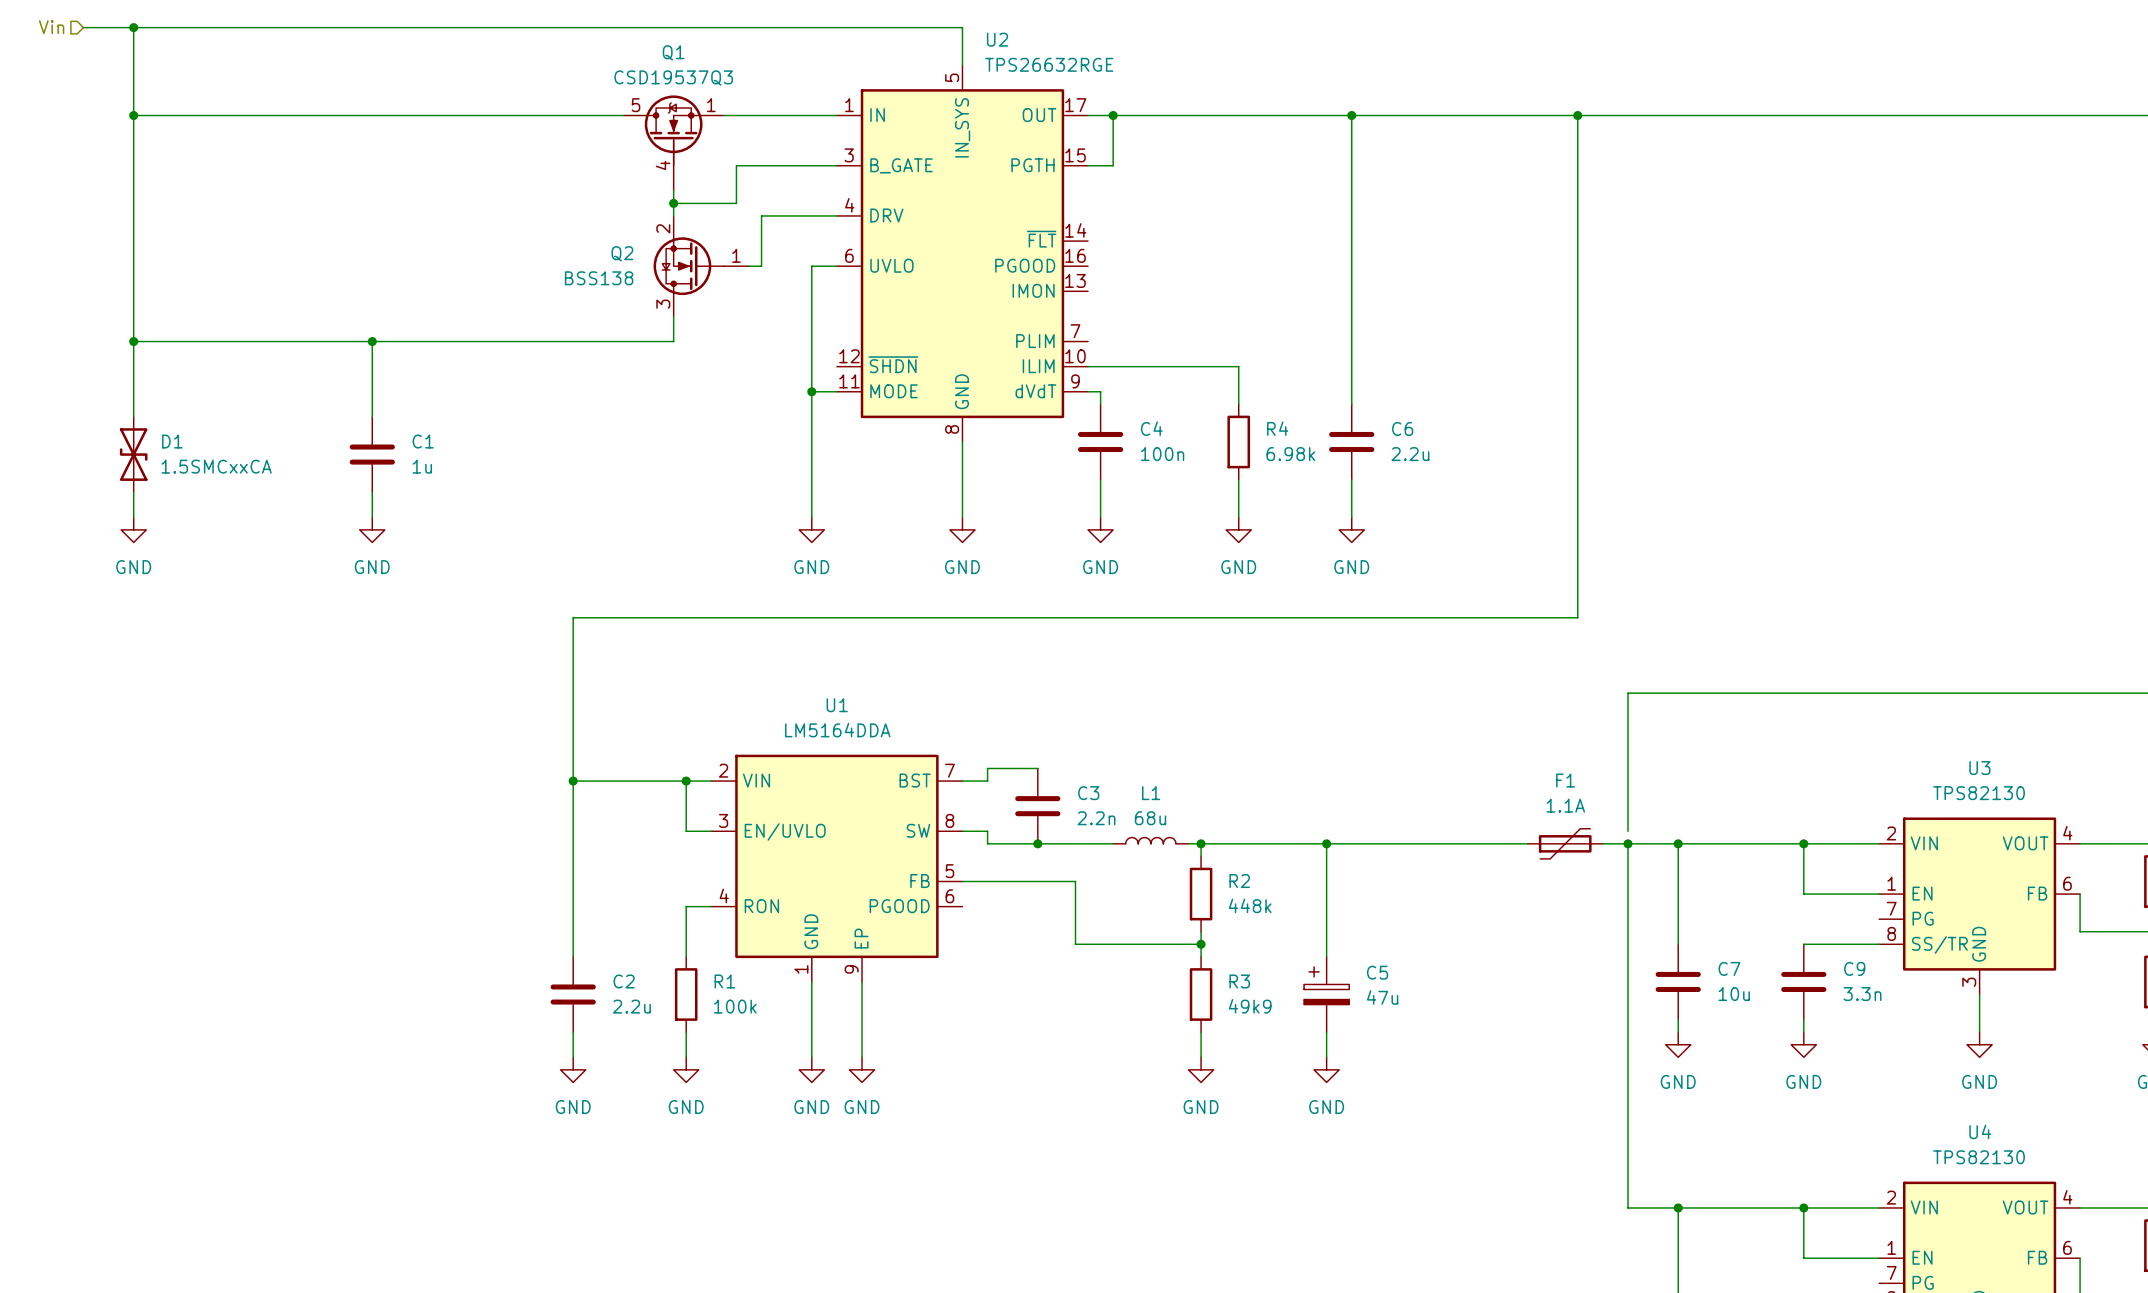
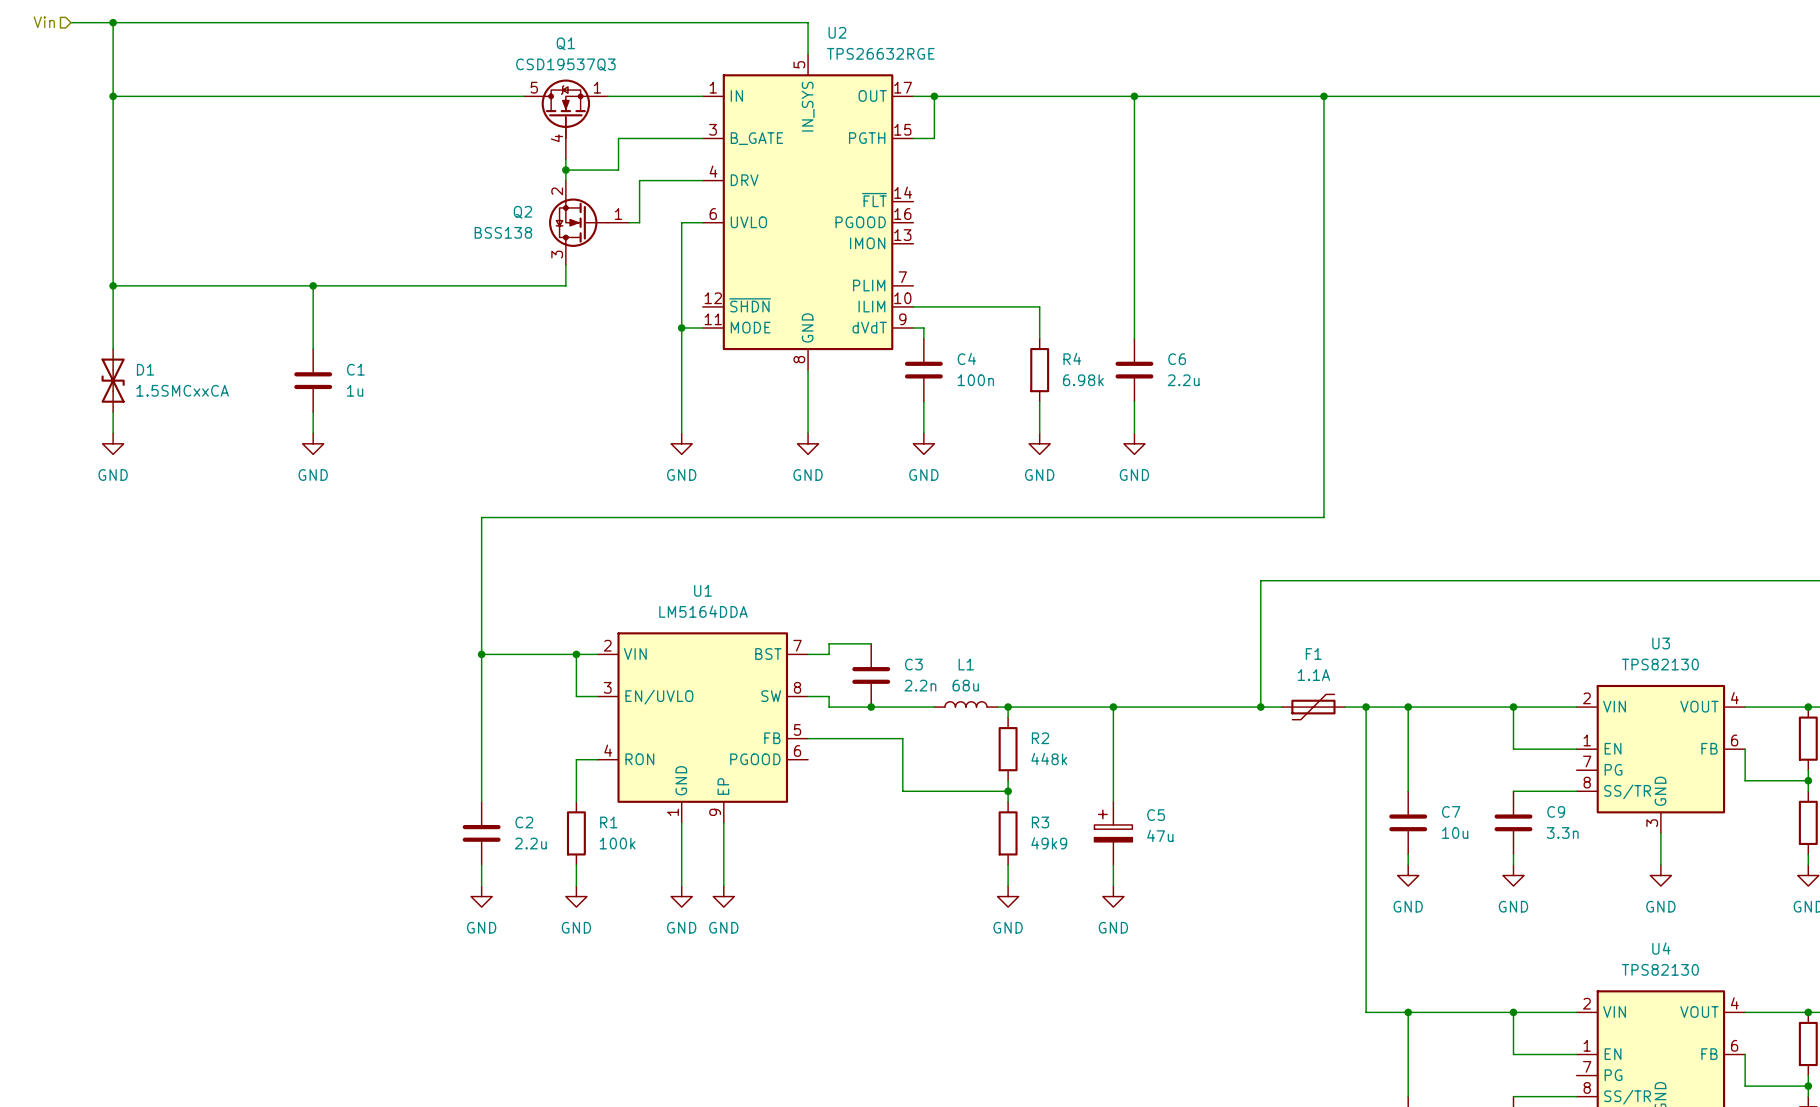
wire: (1628, 693) (1628, 831) -> (1366, 580) (1260, 580) (1260, 707)
junction: none -> (1260, 707)

